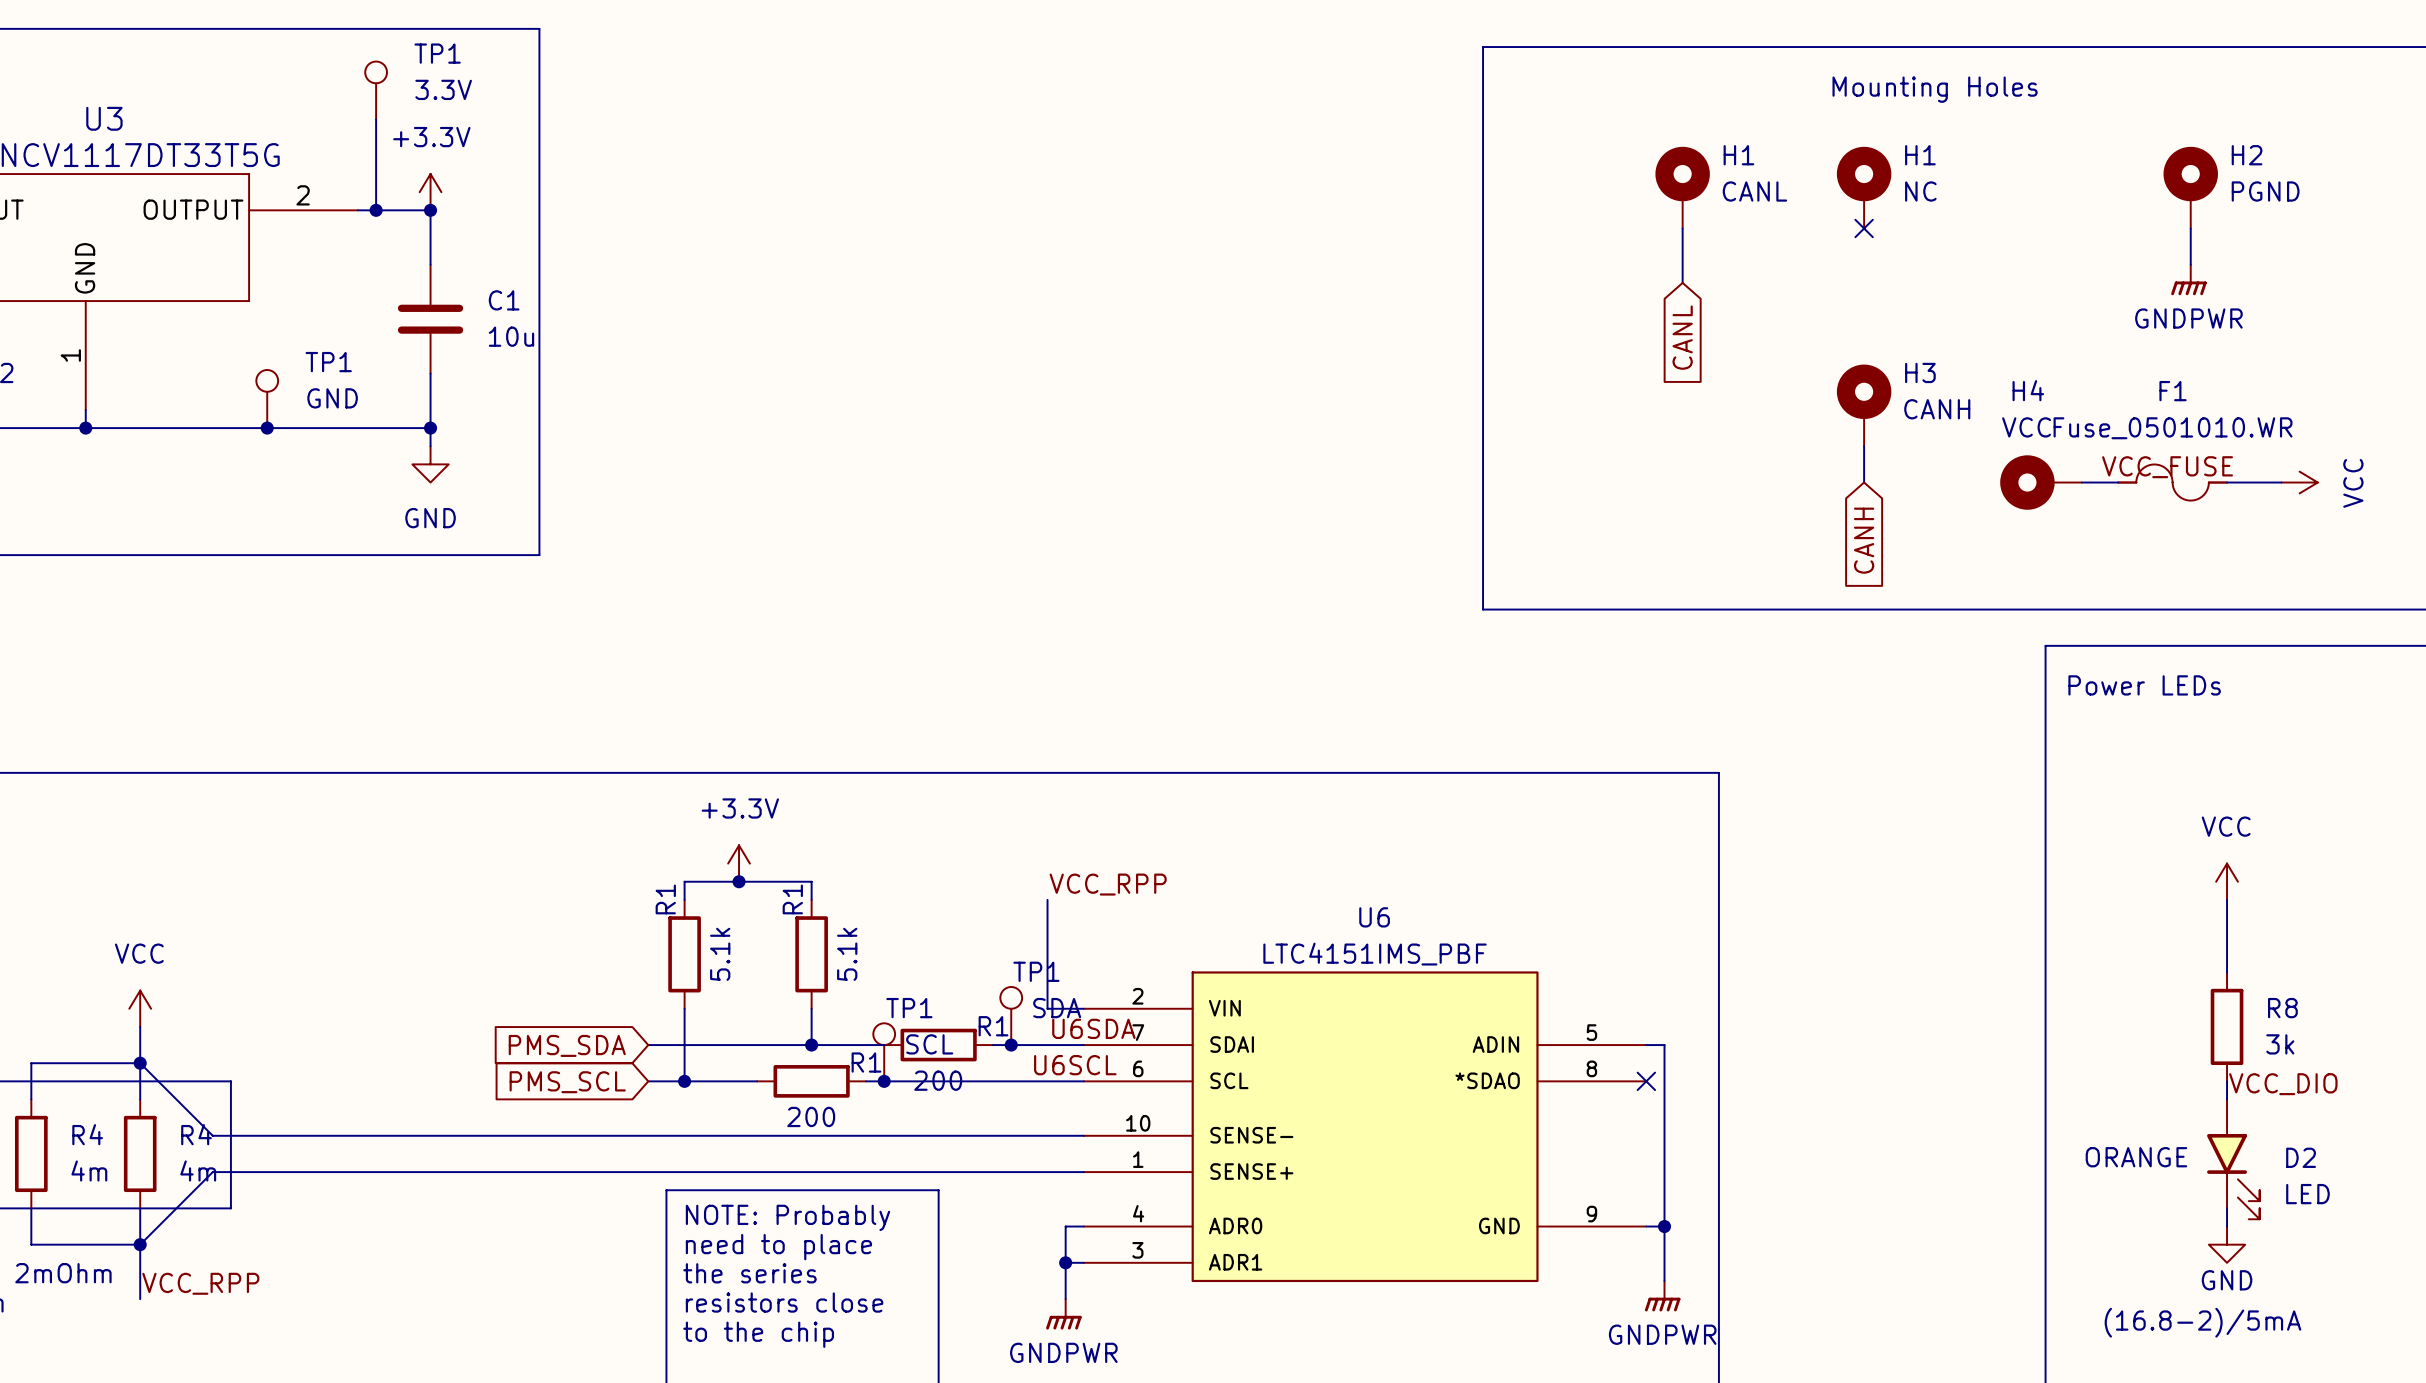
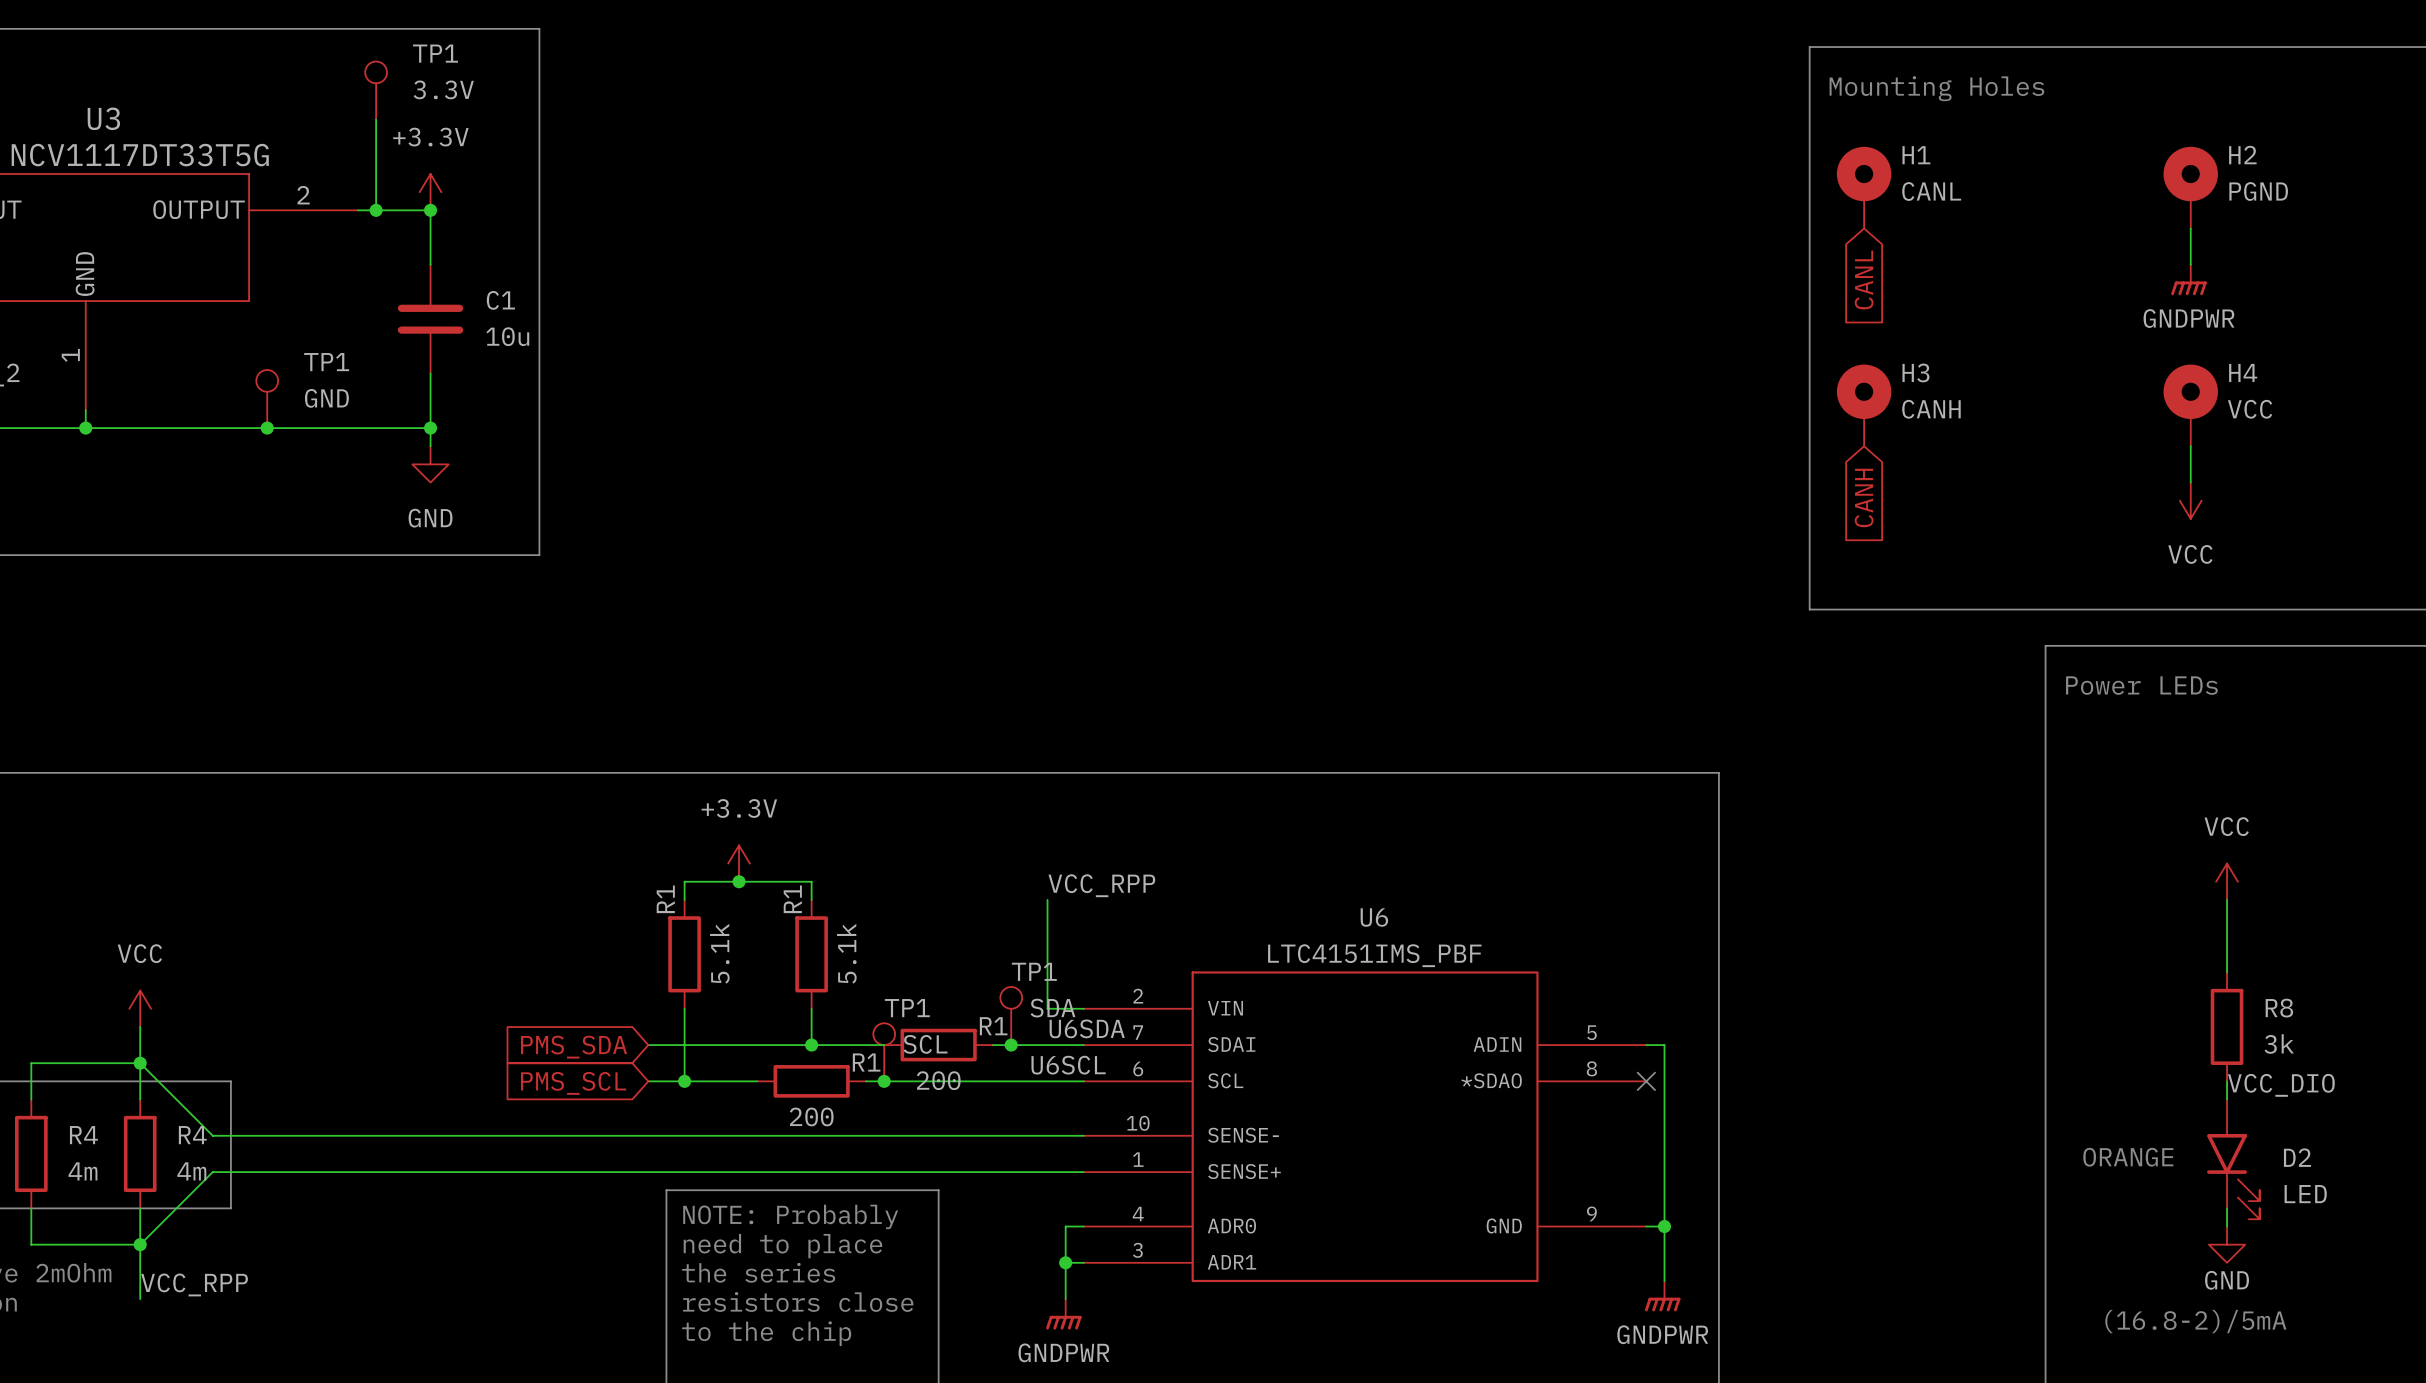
line: (1809, 47) (1483, 47) (1483, 609) (1809, 609) -> (1809, 47) (1809, 609)
H1: CANL (1682, 187) -> none
H1 value: NC (1920, 191) -> CANL (1931, 191)
wire: (1682, 228) (1682, 282) -> none
no-connect mark: (1864, 228) -> none
global label position: CANL (1682, 337) -> CANL (1864, 280)
H4 name position: H4 (2028, 390) -> H4 (2243, 372)
wire: (1864, 446) (1864, 482) -> (2190, 446) (2190, 482)
label: VCC_FUSE (2167, 467) -> none
H4 rotation: 0° (2027, 482) -> 90° clockwise (2190, 391)
H4 position: (2041, 482) -> (2190, 405)
wire: (2081, 482) (2118, 482) -> none
F1: Fuse_0501010.WR (2172, 482) -> none
wire: (2227, 482) (2281, 482) -> none
power symbol rotation: 0° (2299, 482) -> 90° clockwise (2190, 500)
power symbol position: VCC (2299, 482) -> VCC (2190, 500)
global label position: CANH (1864, 540) -> CANH (1864, 497)

